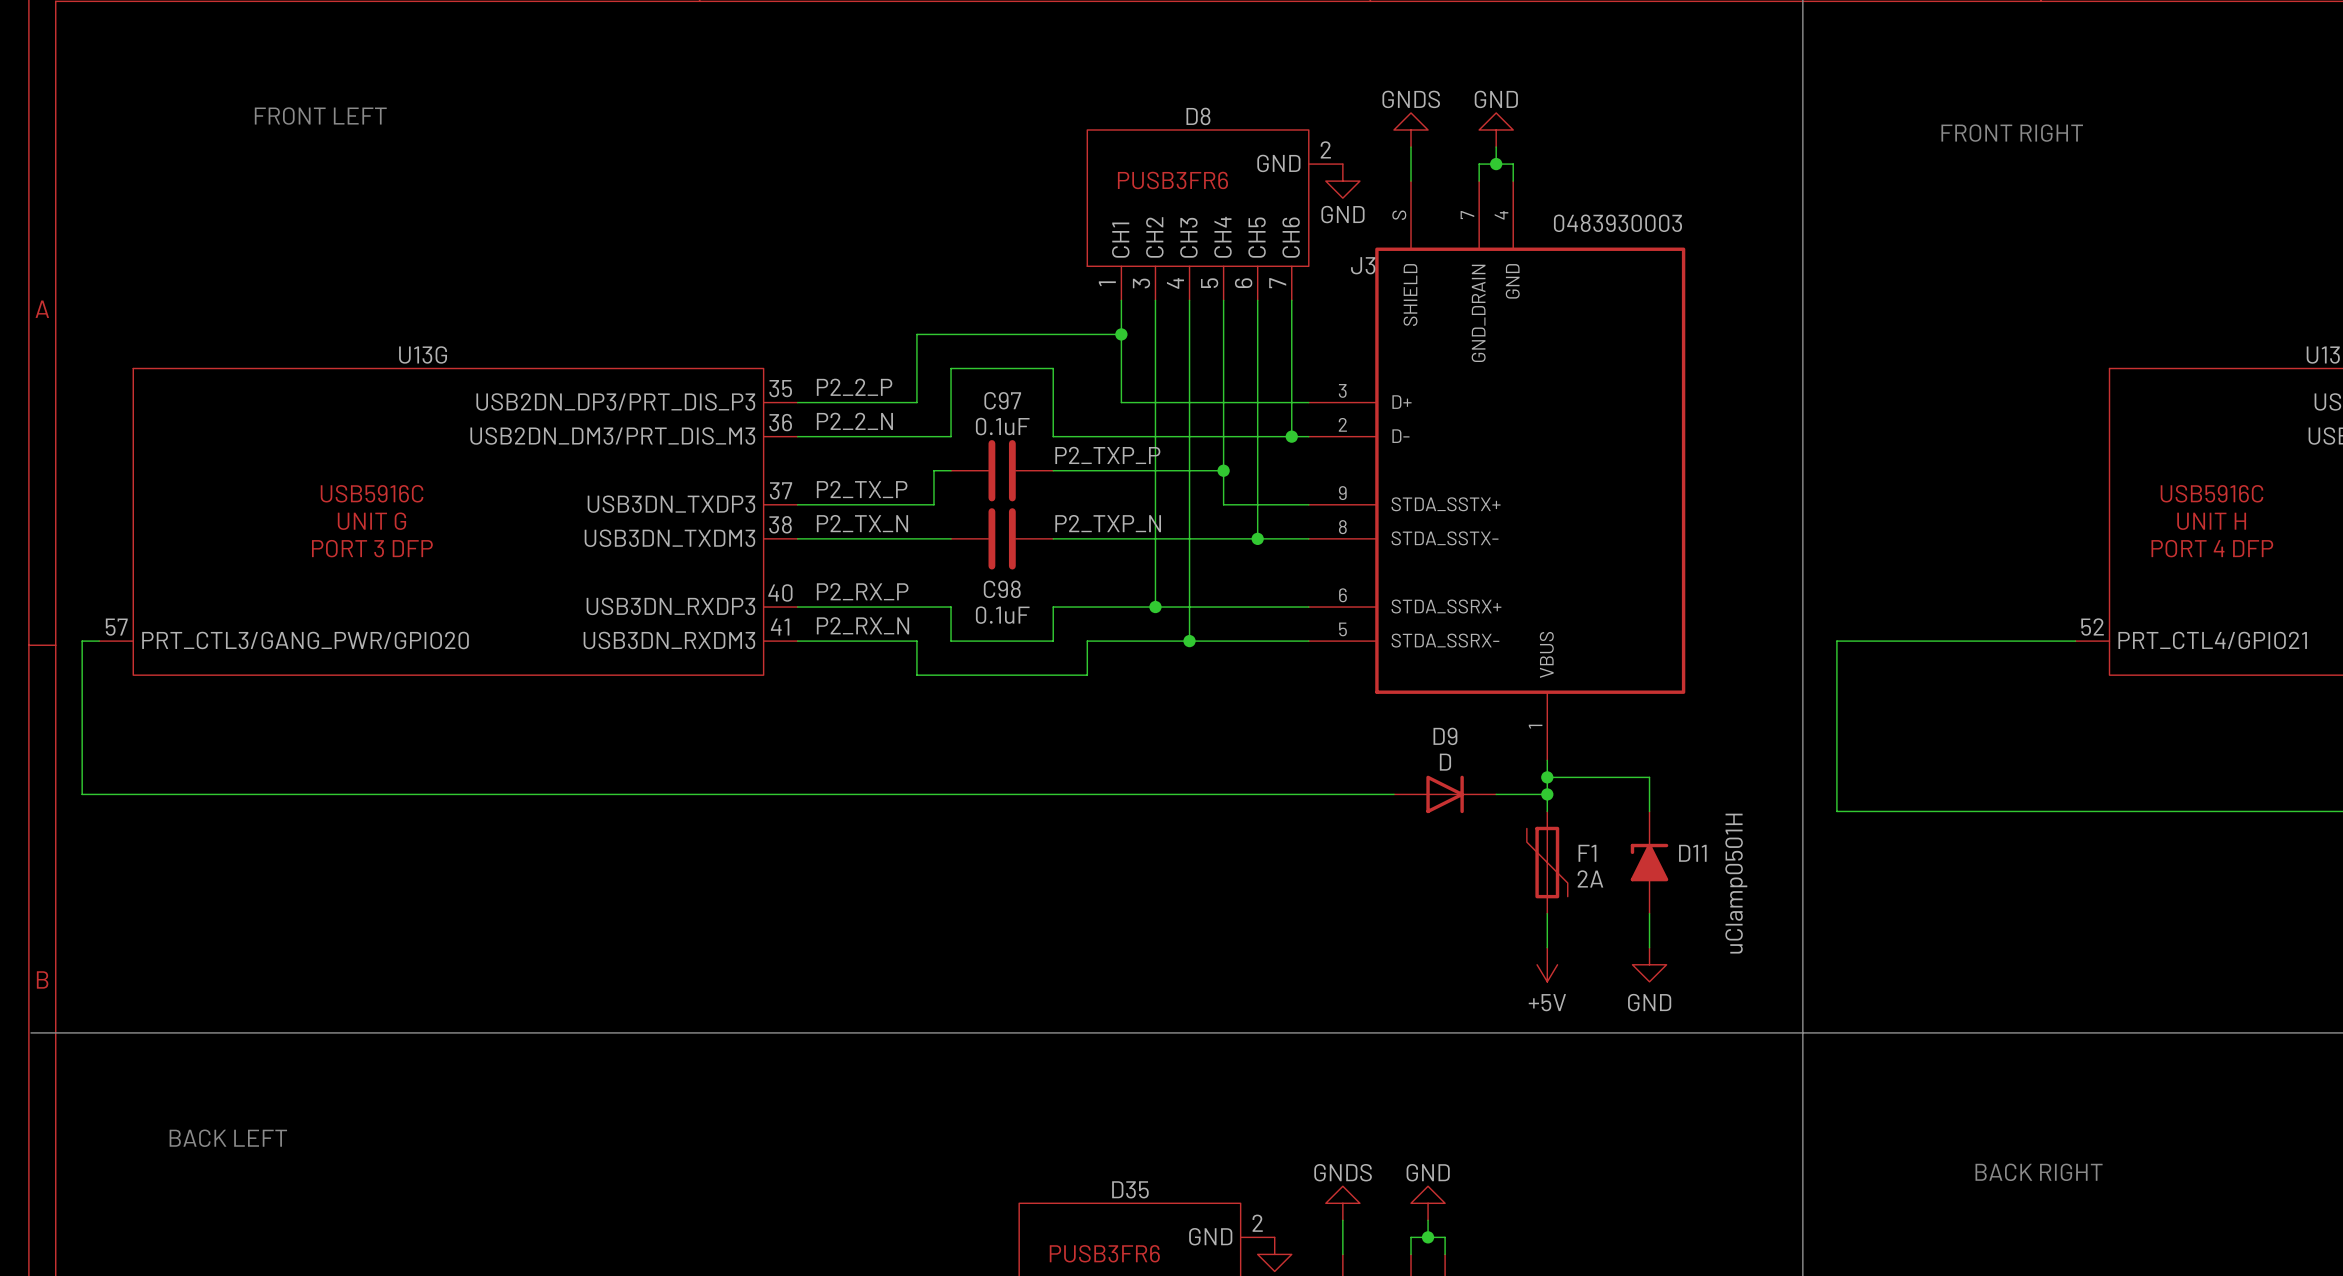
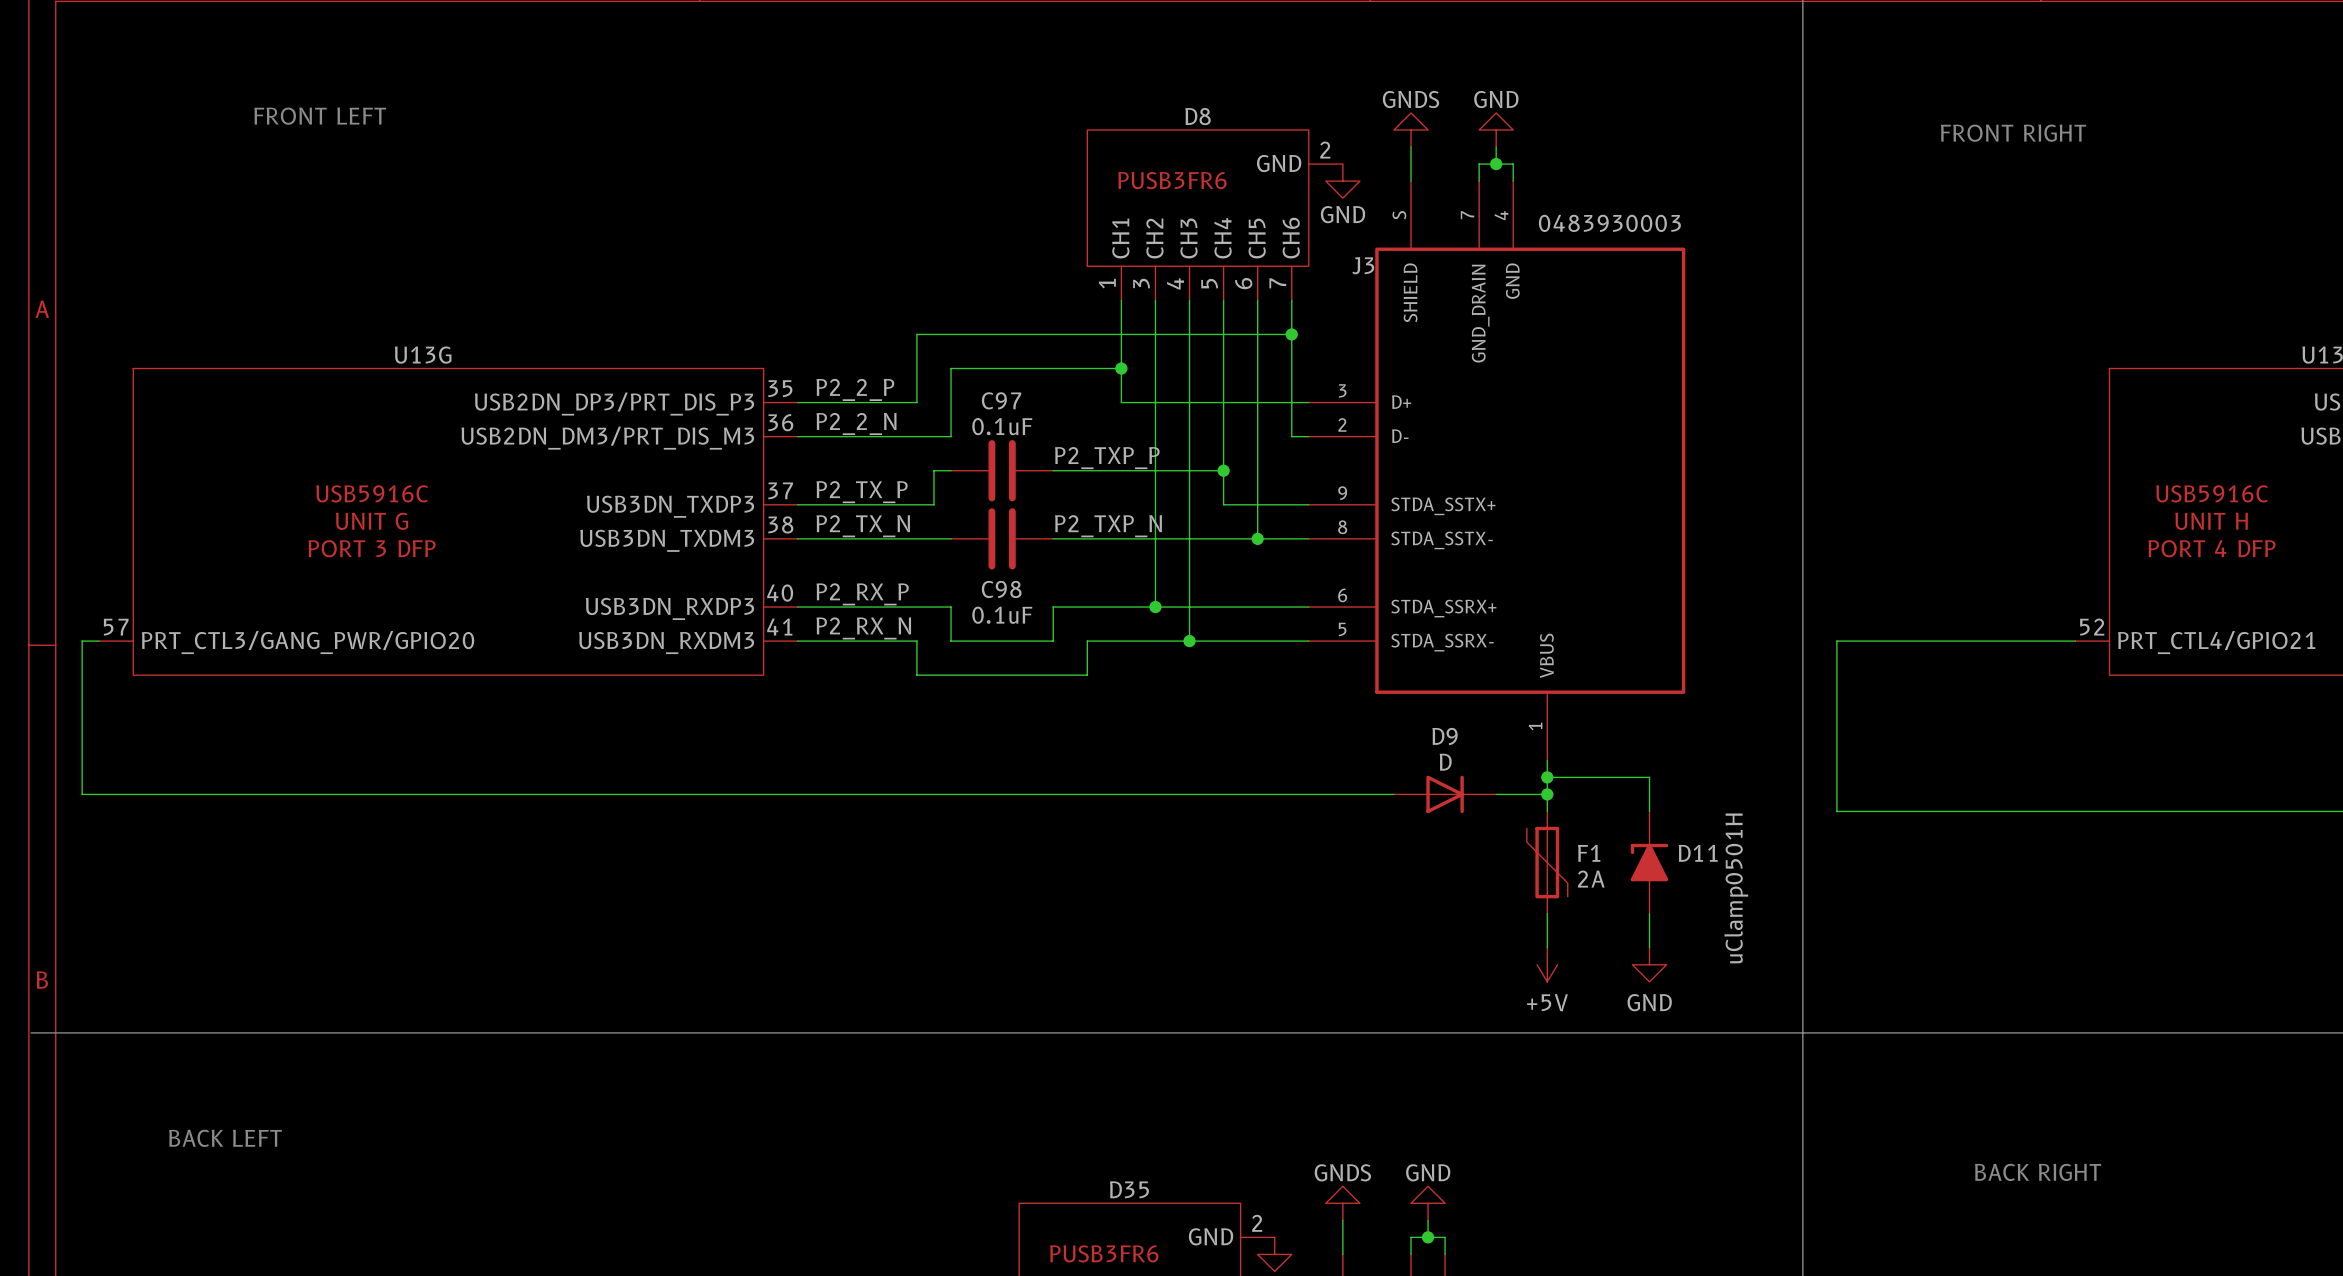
wire: none -> (1121, 334) (1291, 334)
junction position: (1121, 334) -> (1121, 368)
junction: none -> (1291, 334)
wire: (1053, 368) (1053, 436) (1291, 436) -> (1053, 368) (1121, 368)
junction: (1291, 436) -> none

